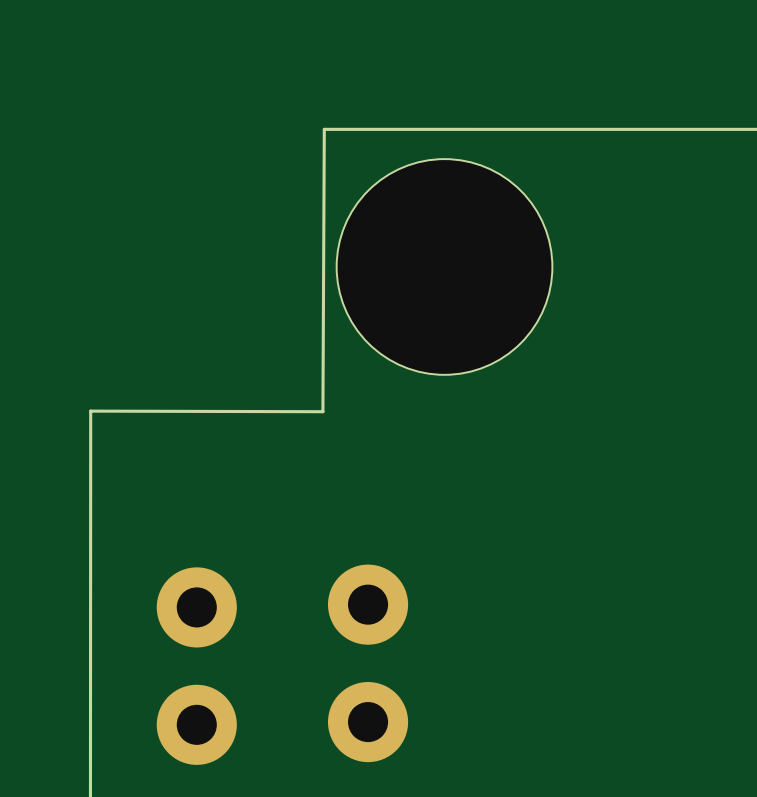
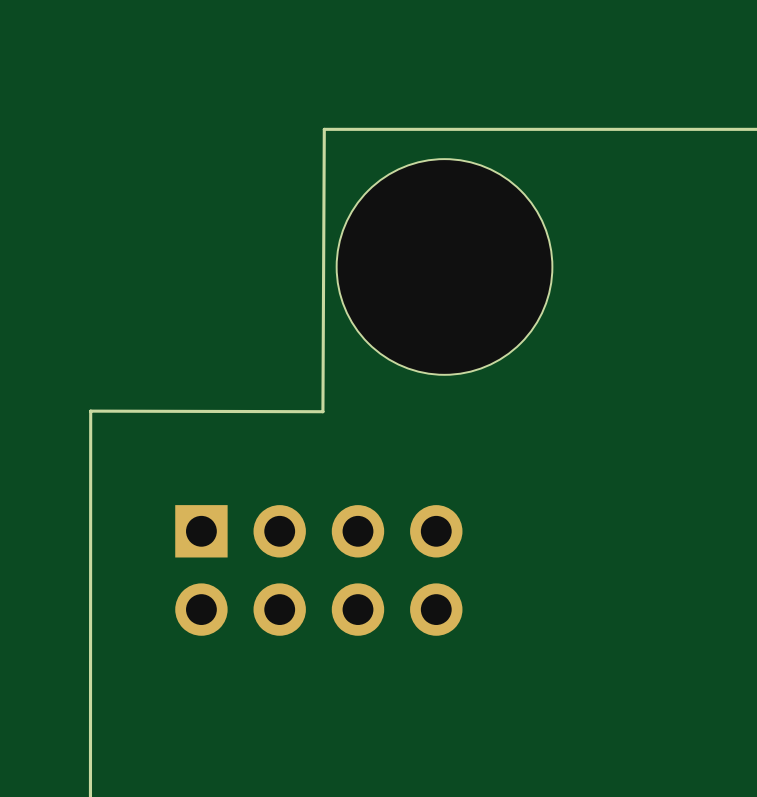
part: none -> (318, 570)
part: (368, 604) -> none
part: (196, 607) -> none
part: (368, 722) -> none
part: (196, 724) -> none

